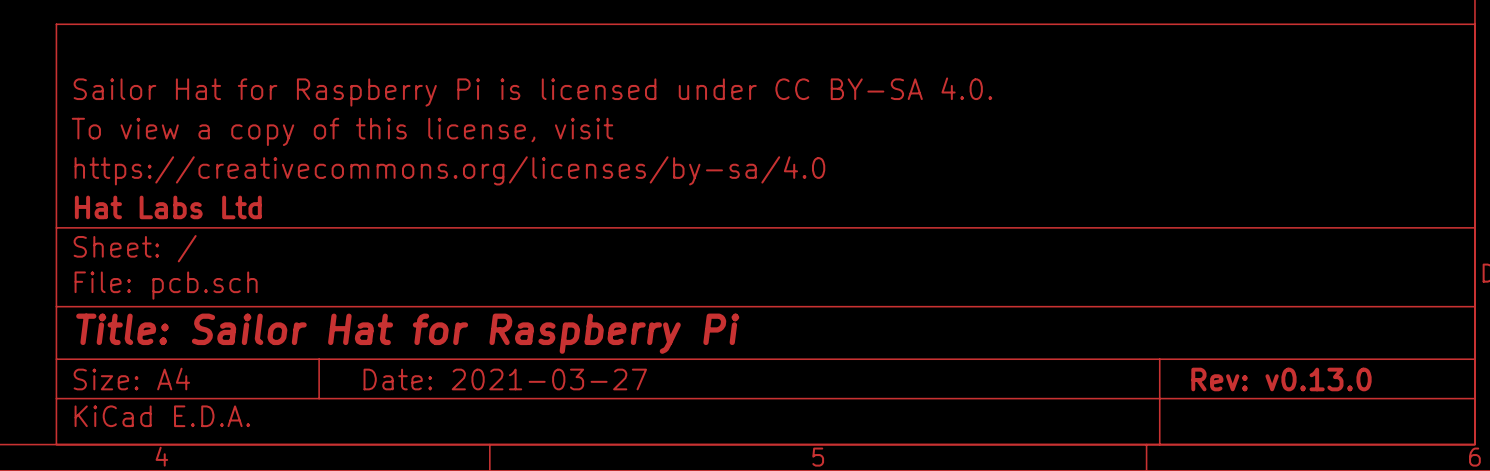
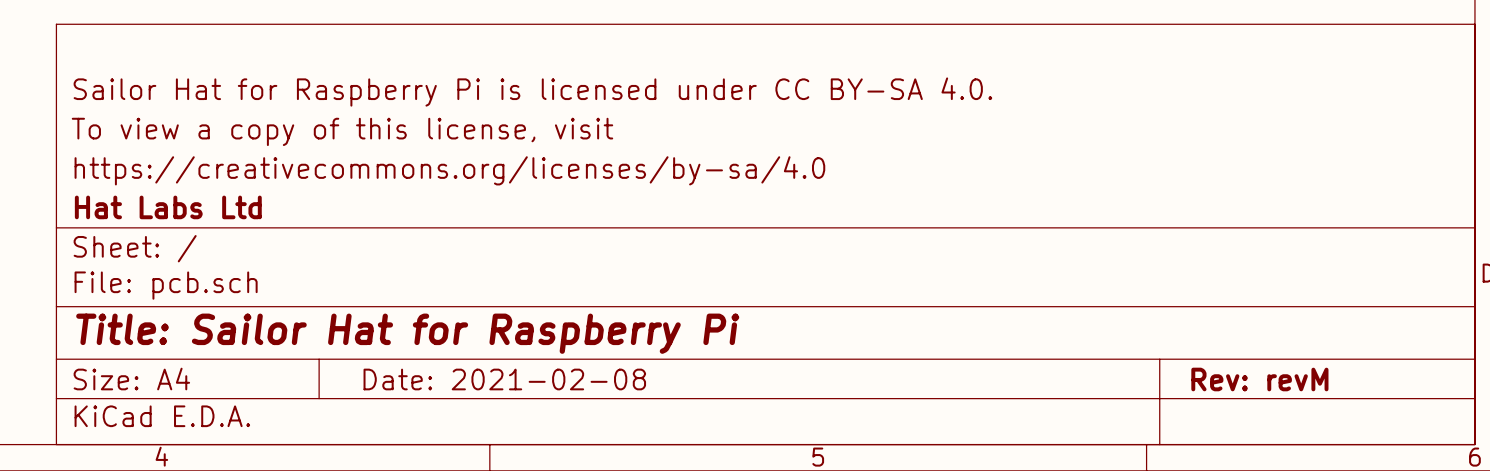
title block: Date: 2021-03-27 (505, 379) -> Date: 2021-02-08 (504, 379)
title block: Rev: v0.13.0 (1281, 379) -> Rev: revM (1259, 379)

